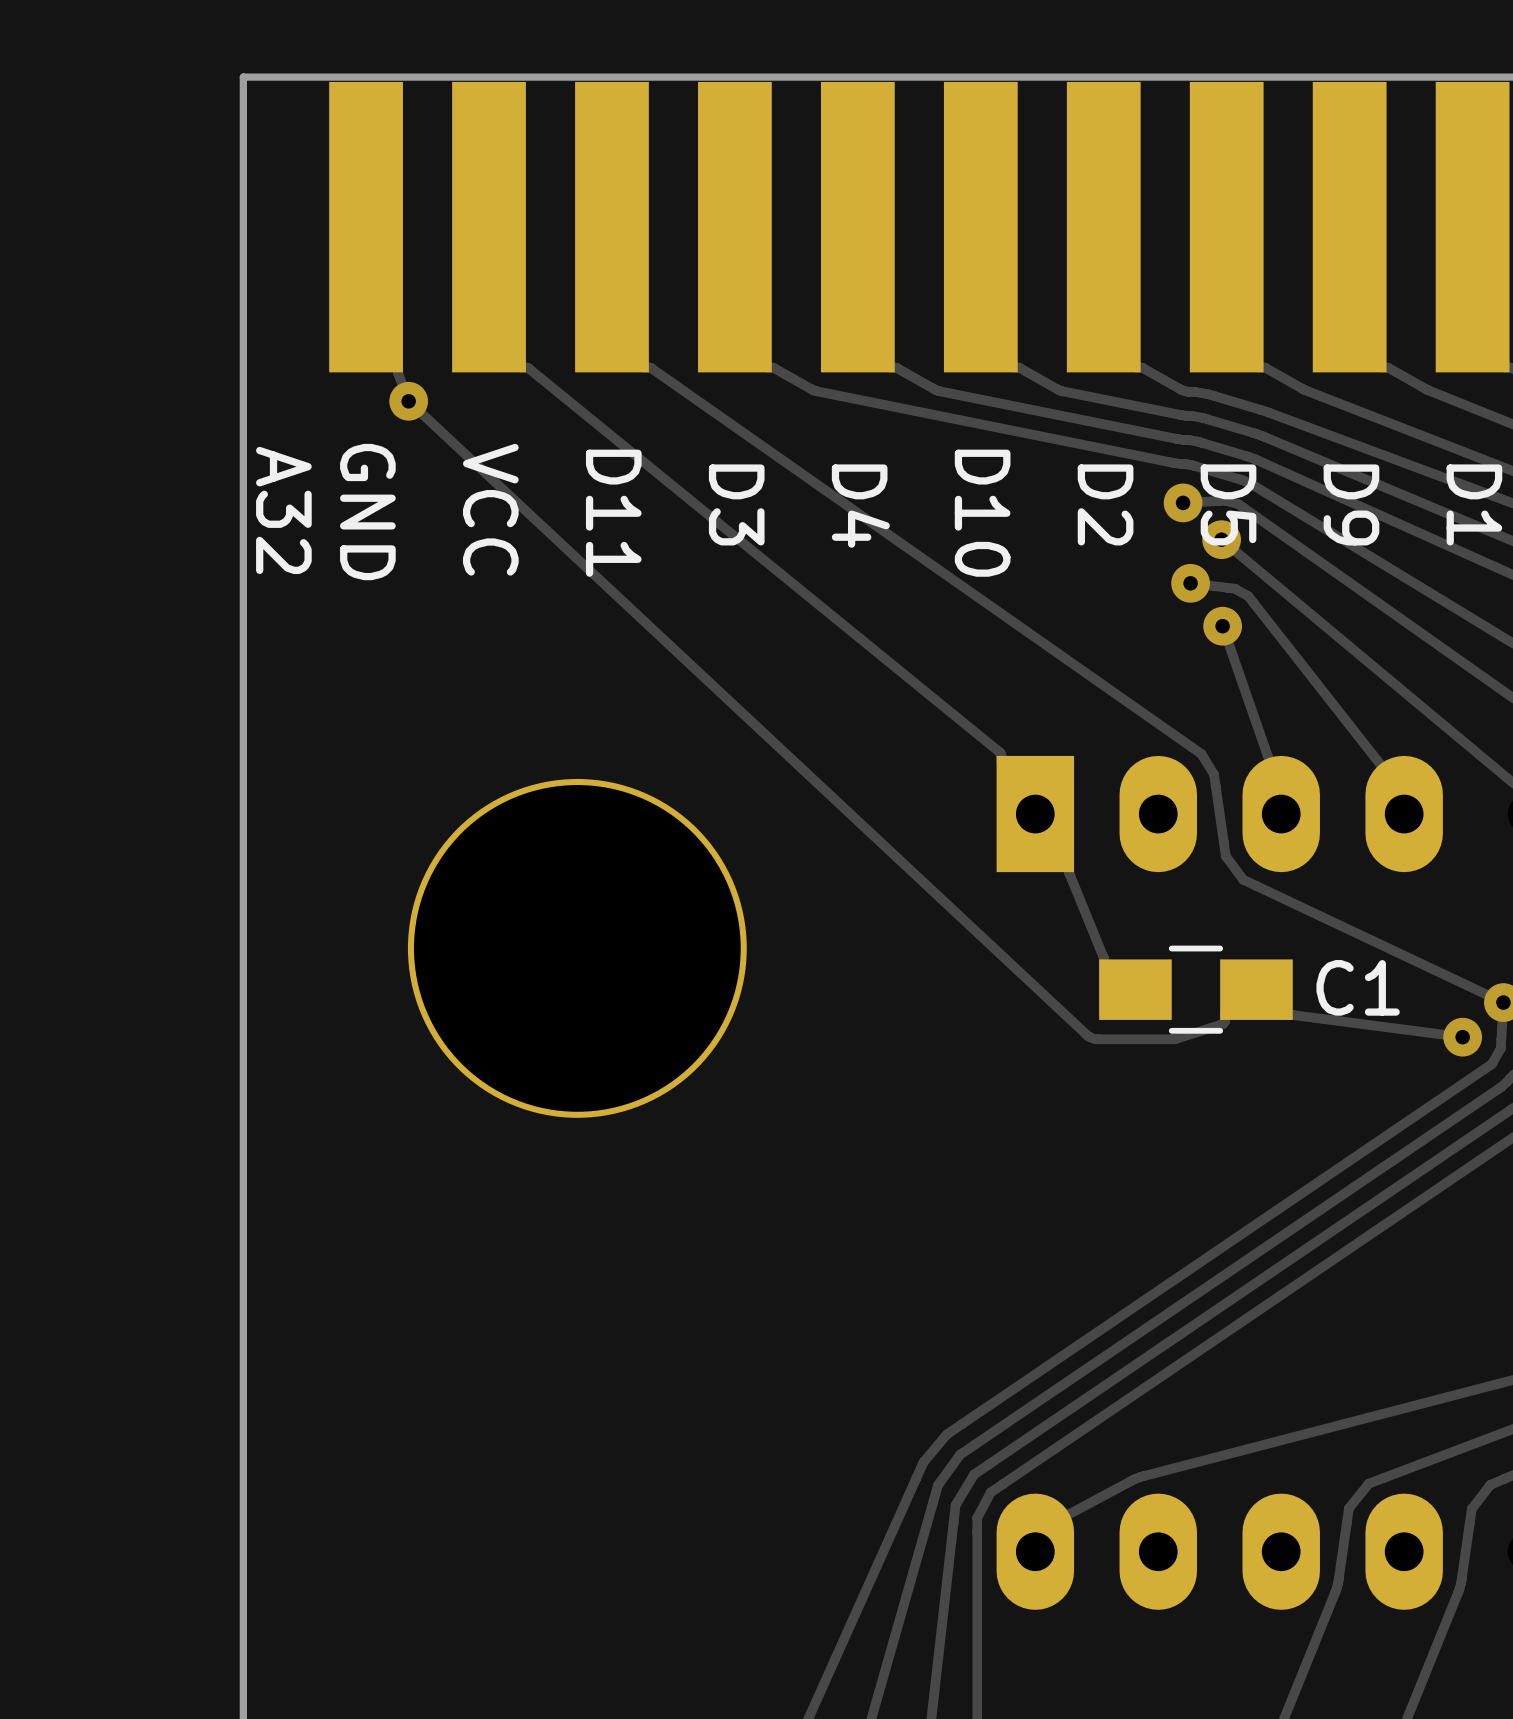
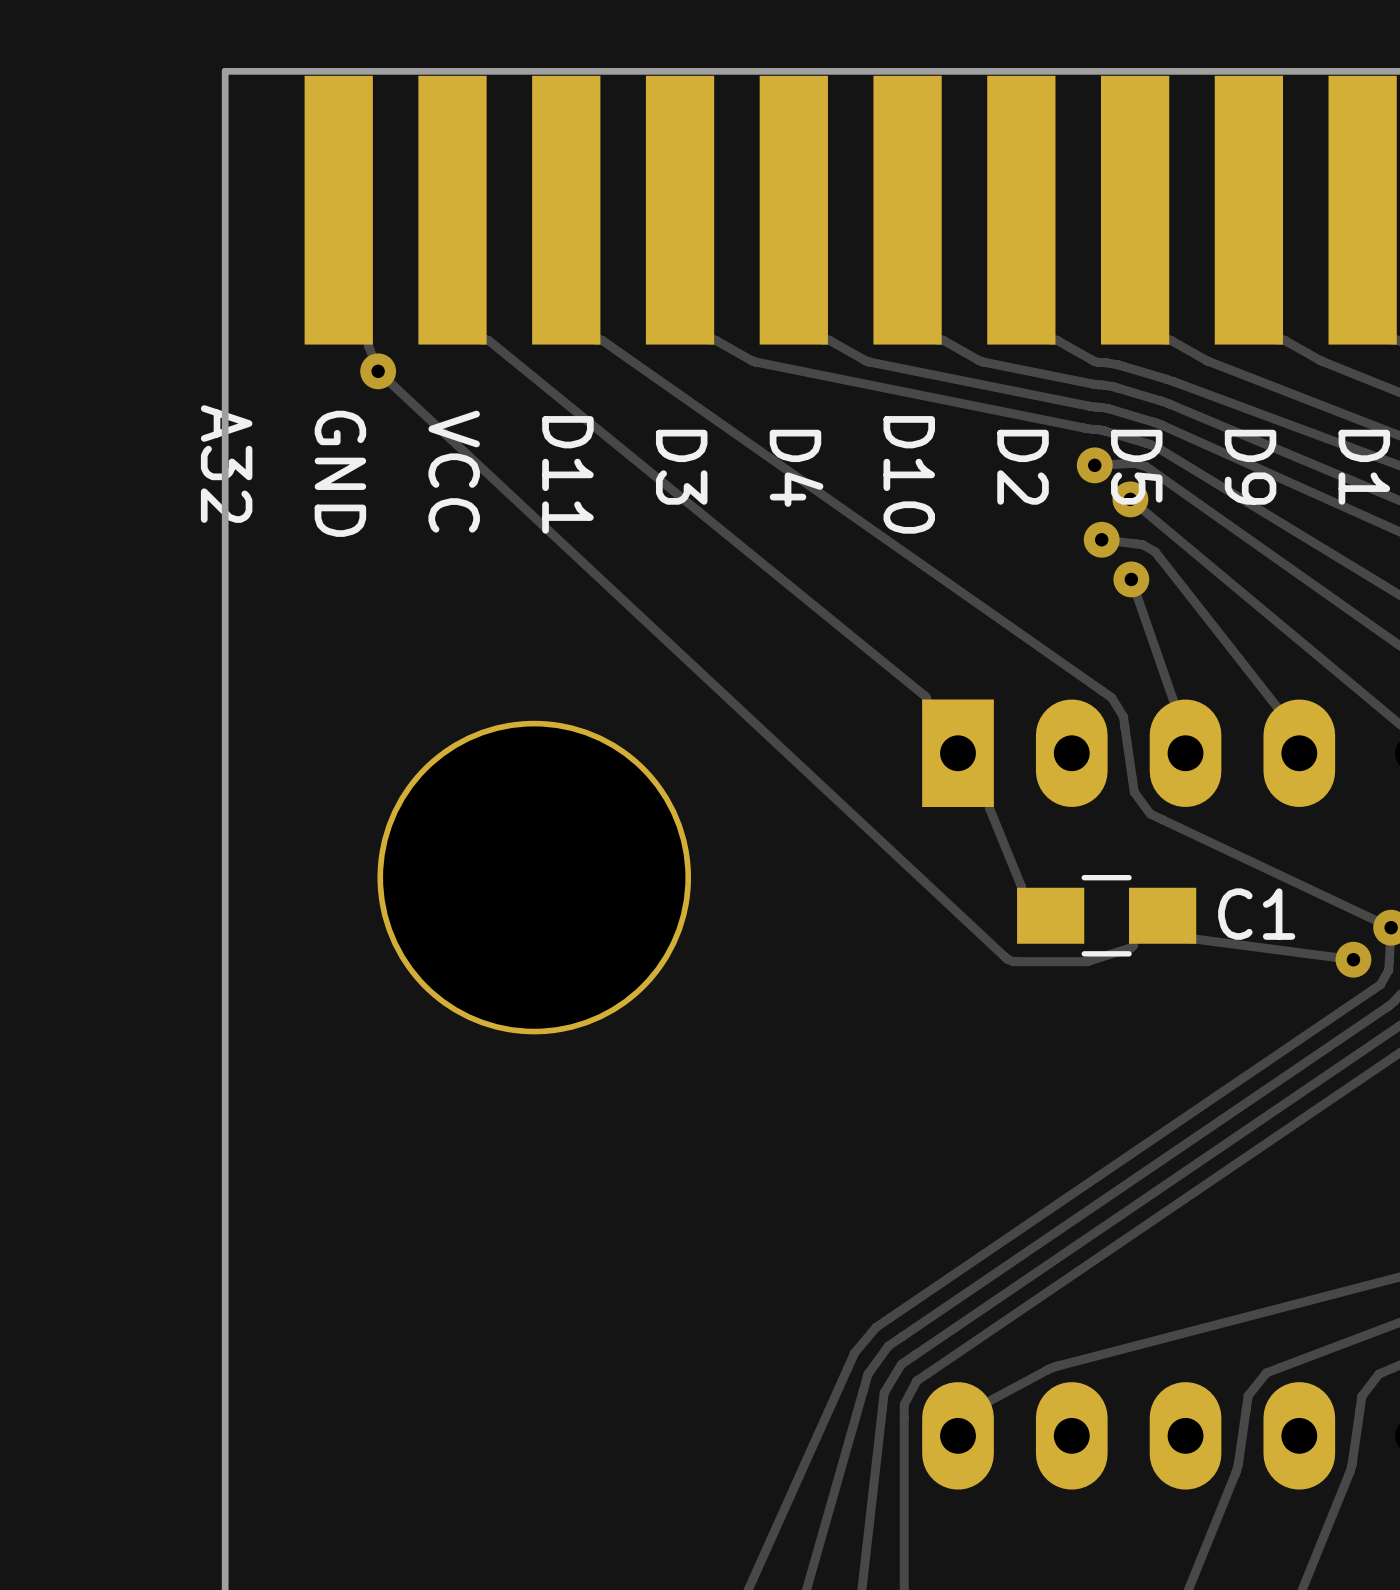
part text position: A32 (283, 510) -> A32 (226, 464)

